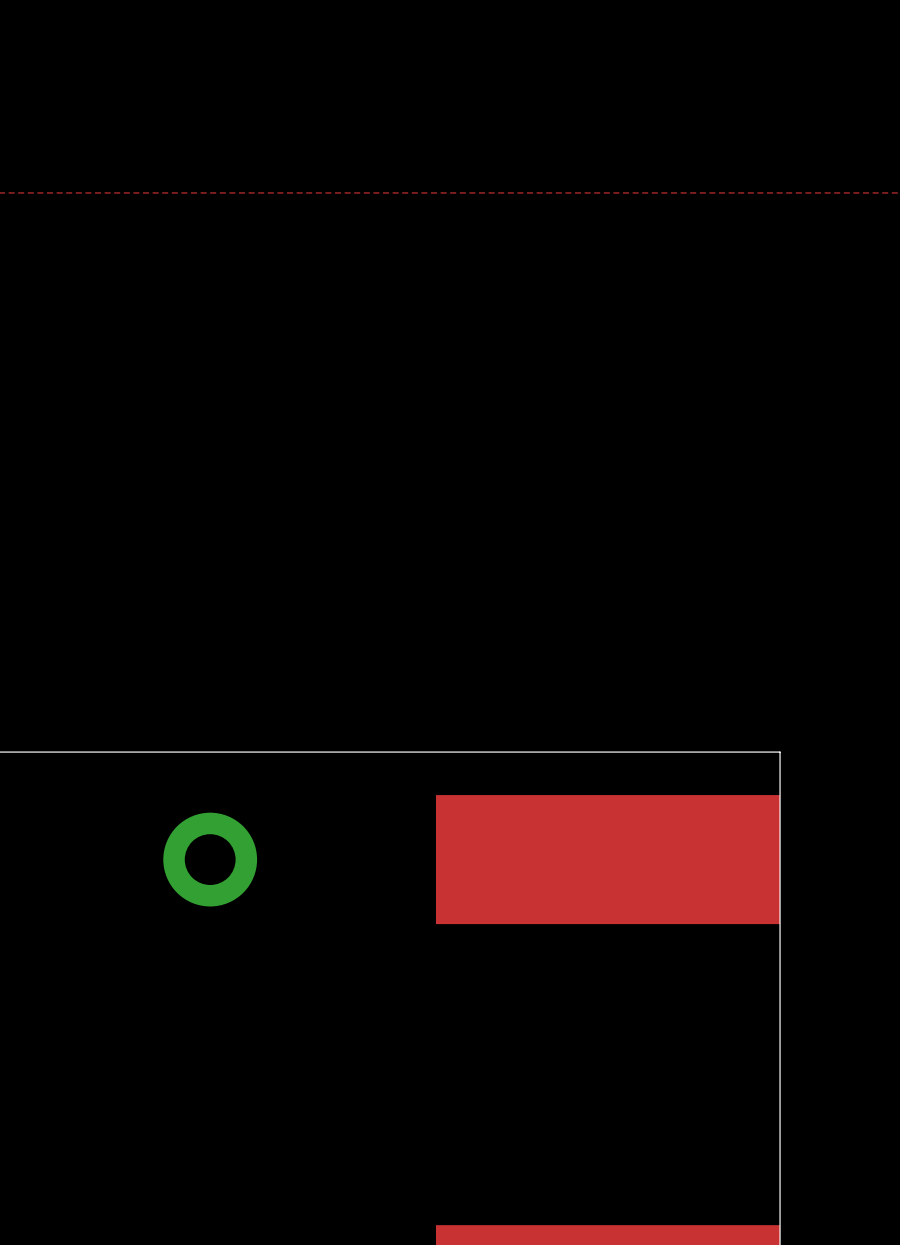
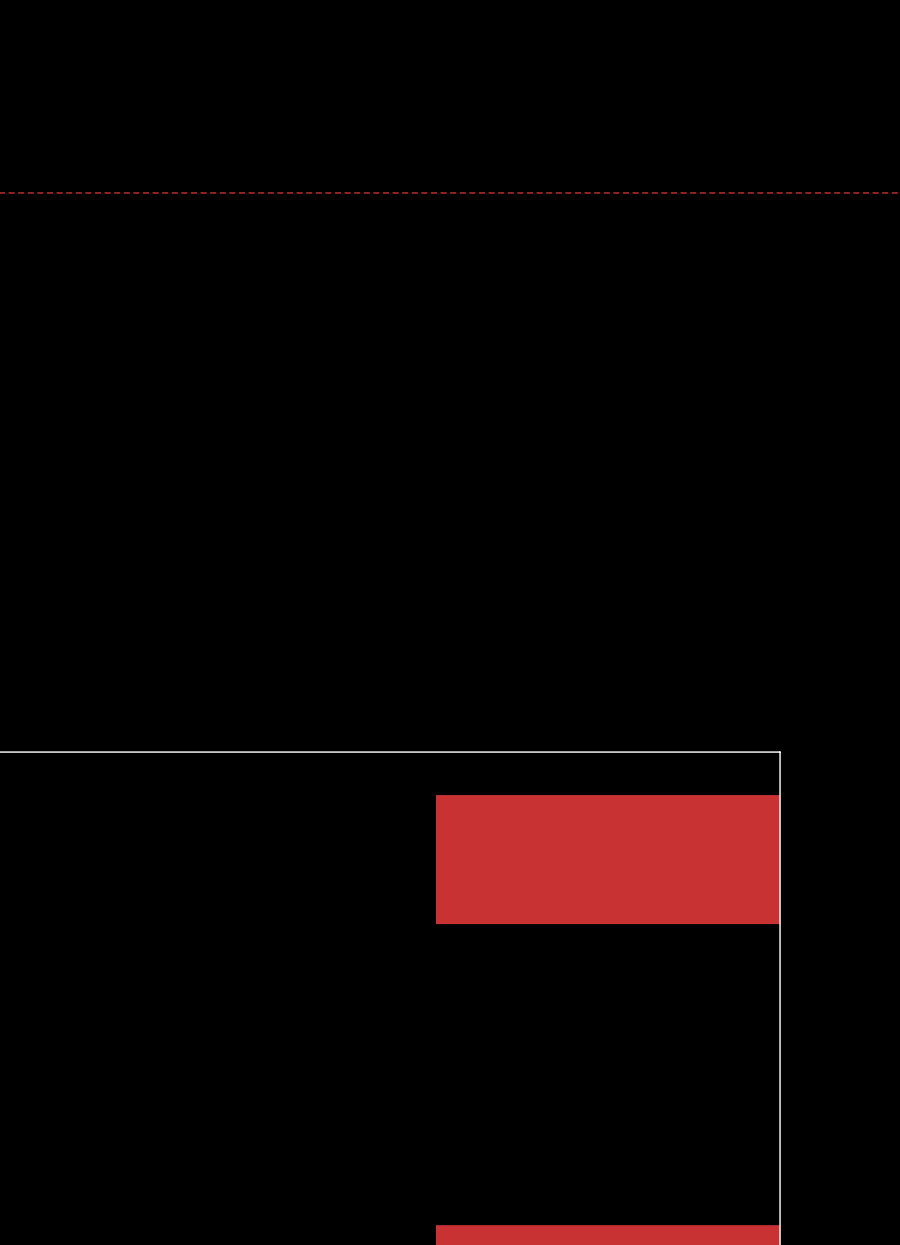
via: (210, 859) -> none

